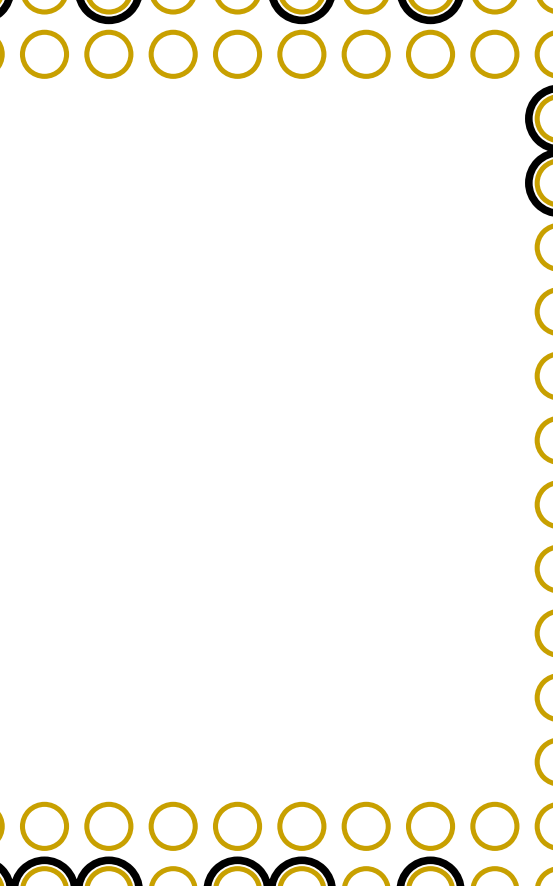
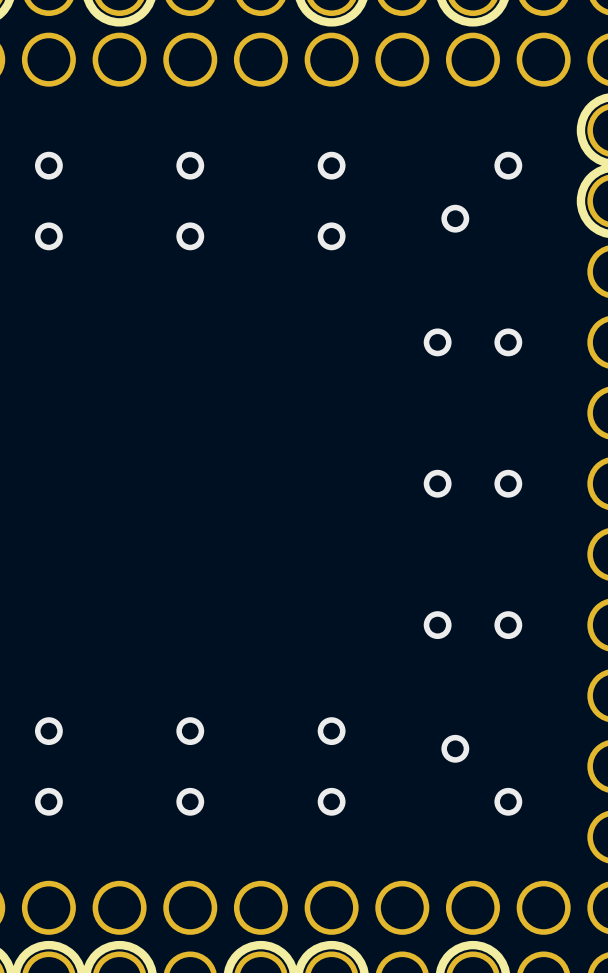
via: none -> (48, 165)
via: none -> (190, 165)
via: none -> (331, 165)
via: none -> (508, 165)
via: none -> (455, 218)
via: none -> (48, 236)
via: none -> (190, 236)
via: none -> (331, 236)
via: none -> (437, 342)
via: none -> (508, 342)
via: none -> (437, 483)
via: none -> (508, 483)
via: none -> (437, 625)
via: none -> (508, 625)
via: none -> (48, 731)
via: none -> (190, 731)
via: none -> (331, 731)
via: none -> (455, 748)
via: none -> (48, 801)
via: none -> (190, 801)
via: none -> (331, 801)
via: none -> (508, 801)

